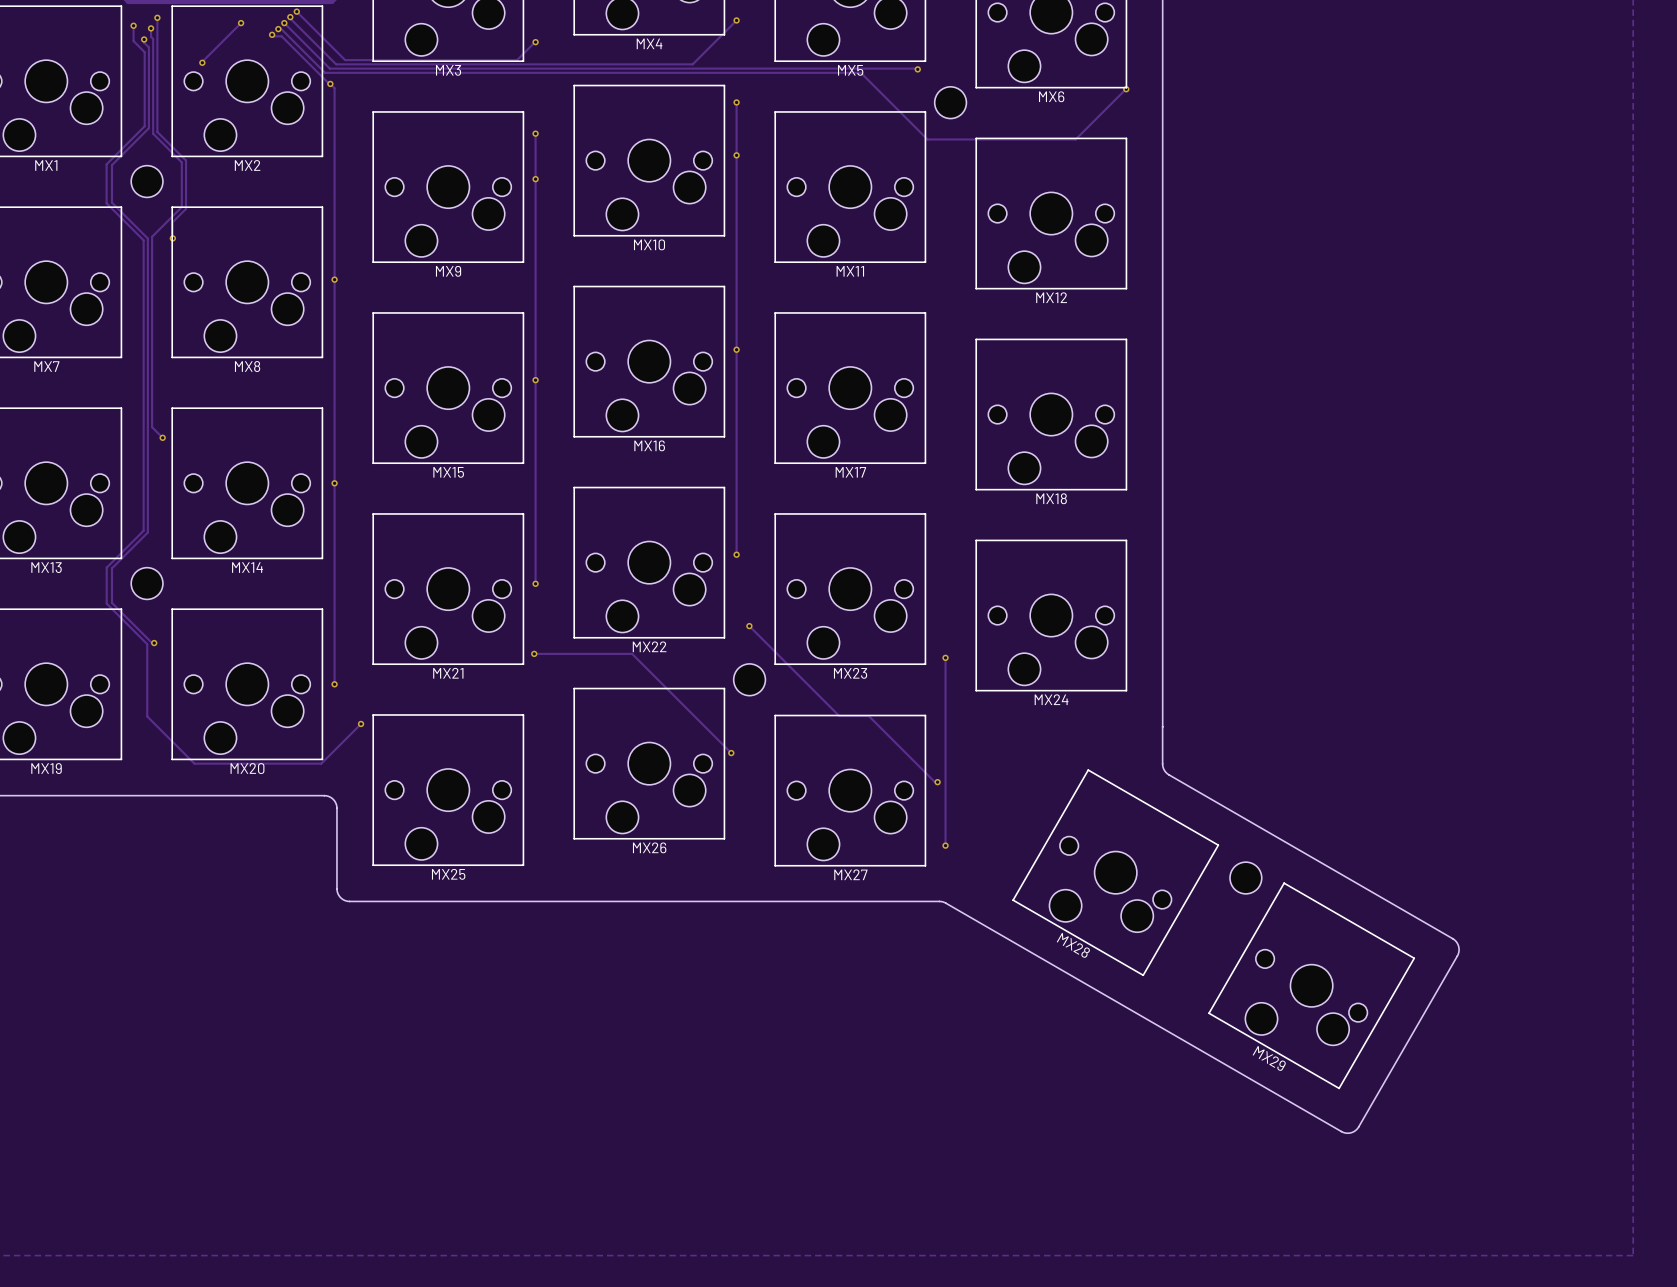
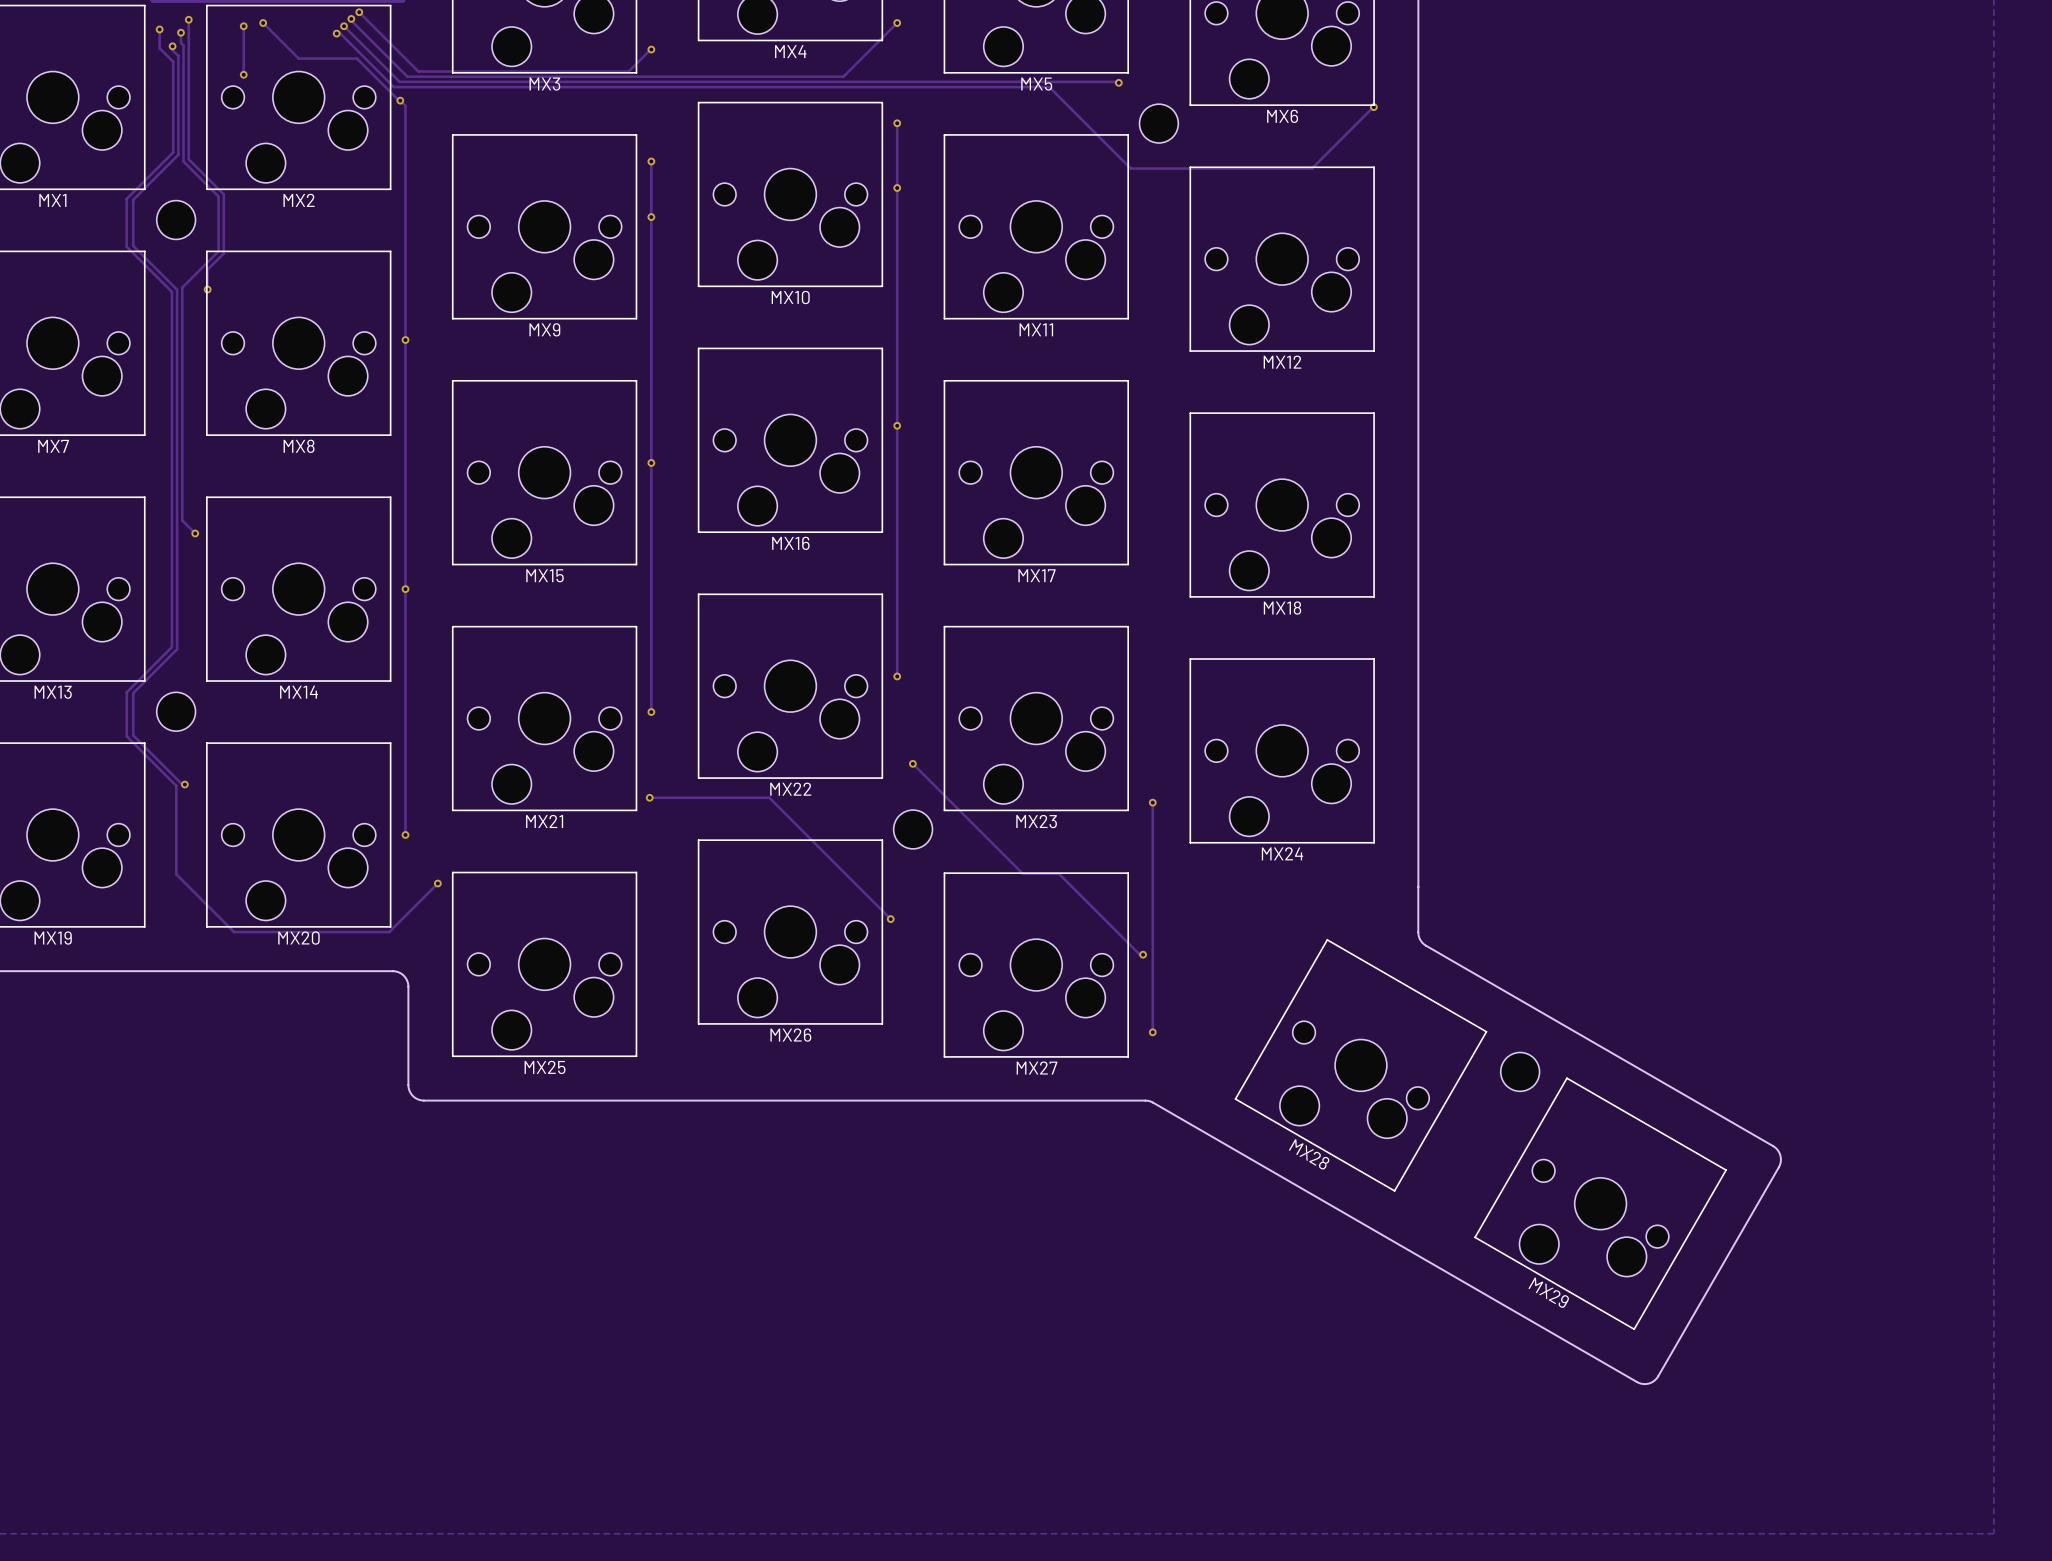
via: none -> (263, 23)
via: none -> (243, 26)
track: (241, 23) (202, 61) -> (243, 26) (243, 73)
via: (241, 23) -> none
track: (272, 34) (281, 36) (294, 49) -> (263, 23) (298, 58) (356, 58)
via: (272, 34) -> none

